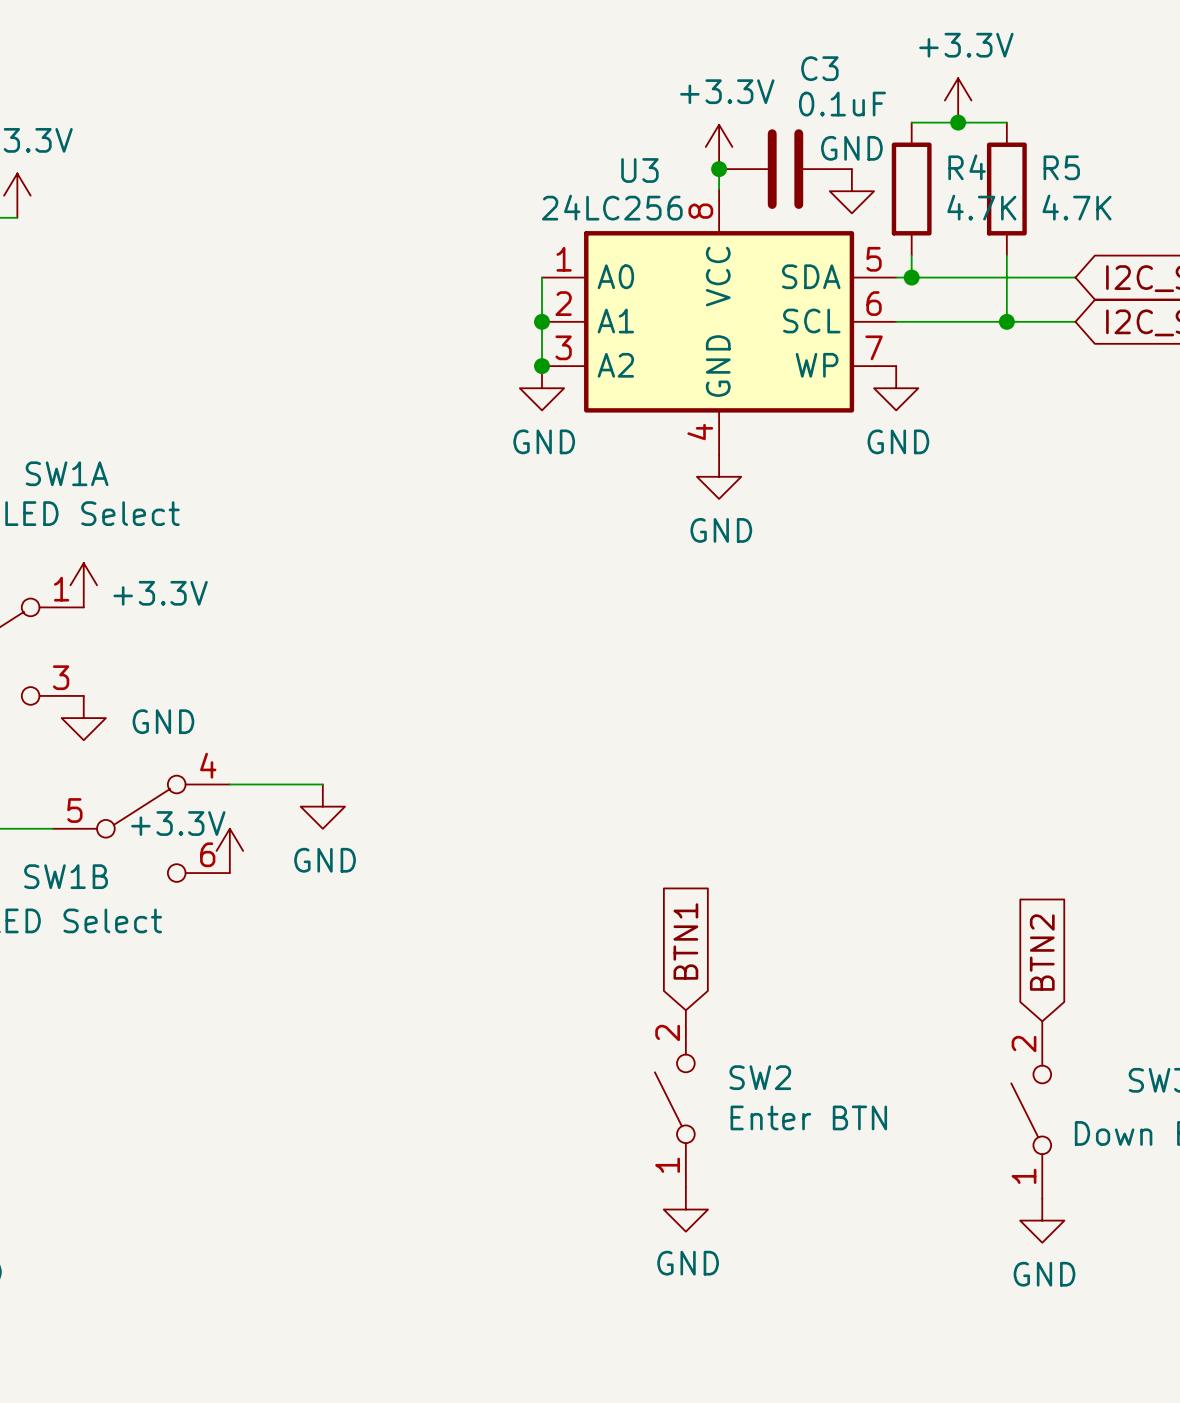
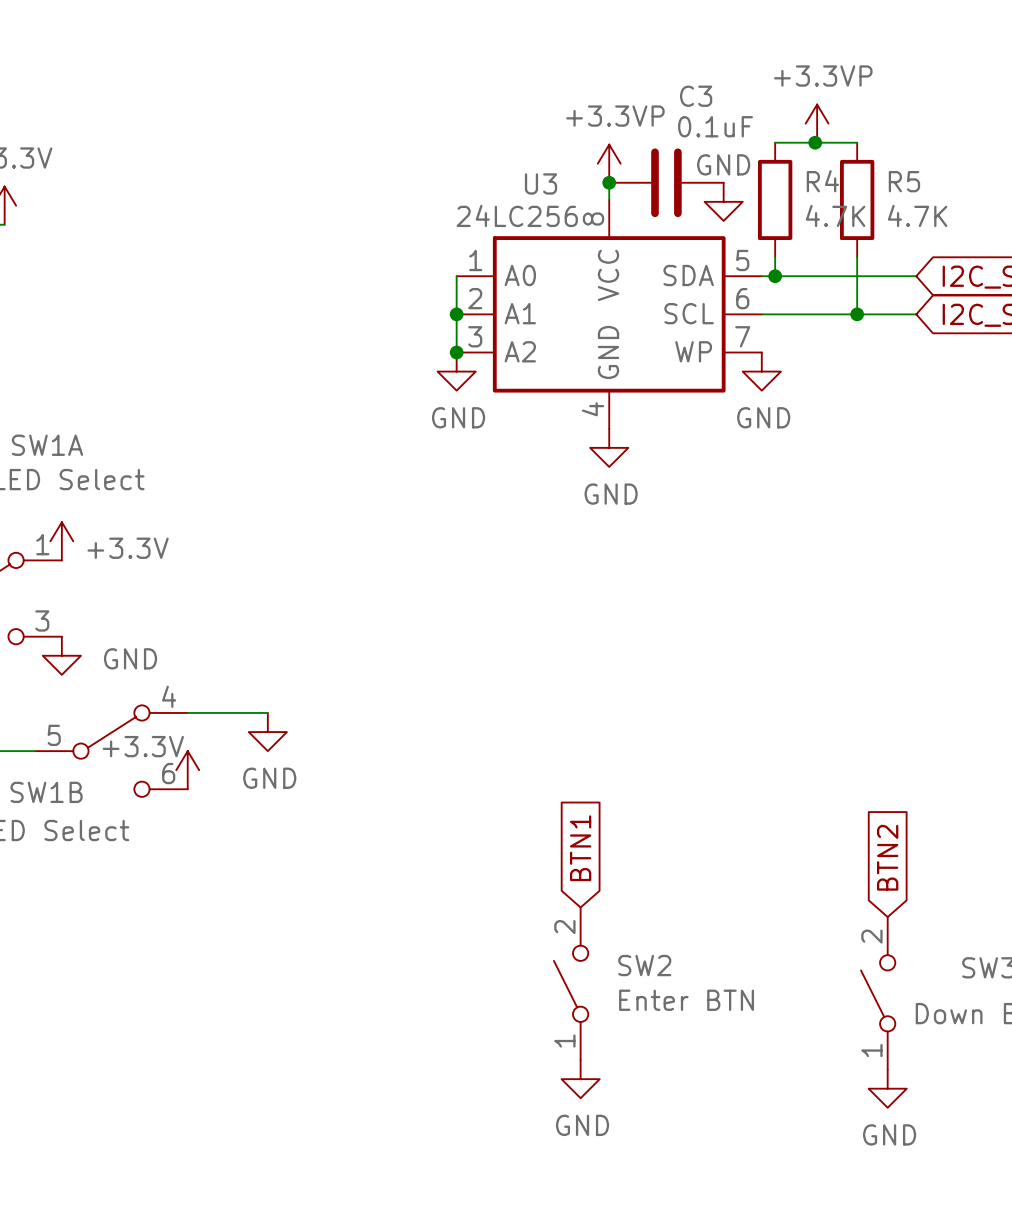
power symbol: +3.3V (958, 100) -> +3.3VP (817, 123)
power symbol: +3.3V (719, 146) -> +3.3VP (609, 163)

